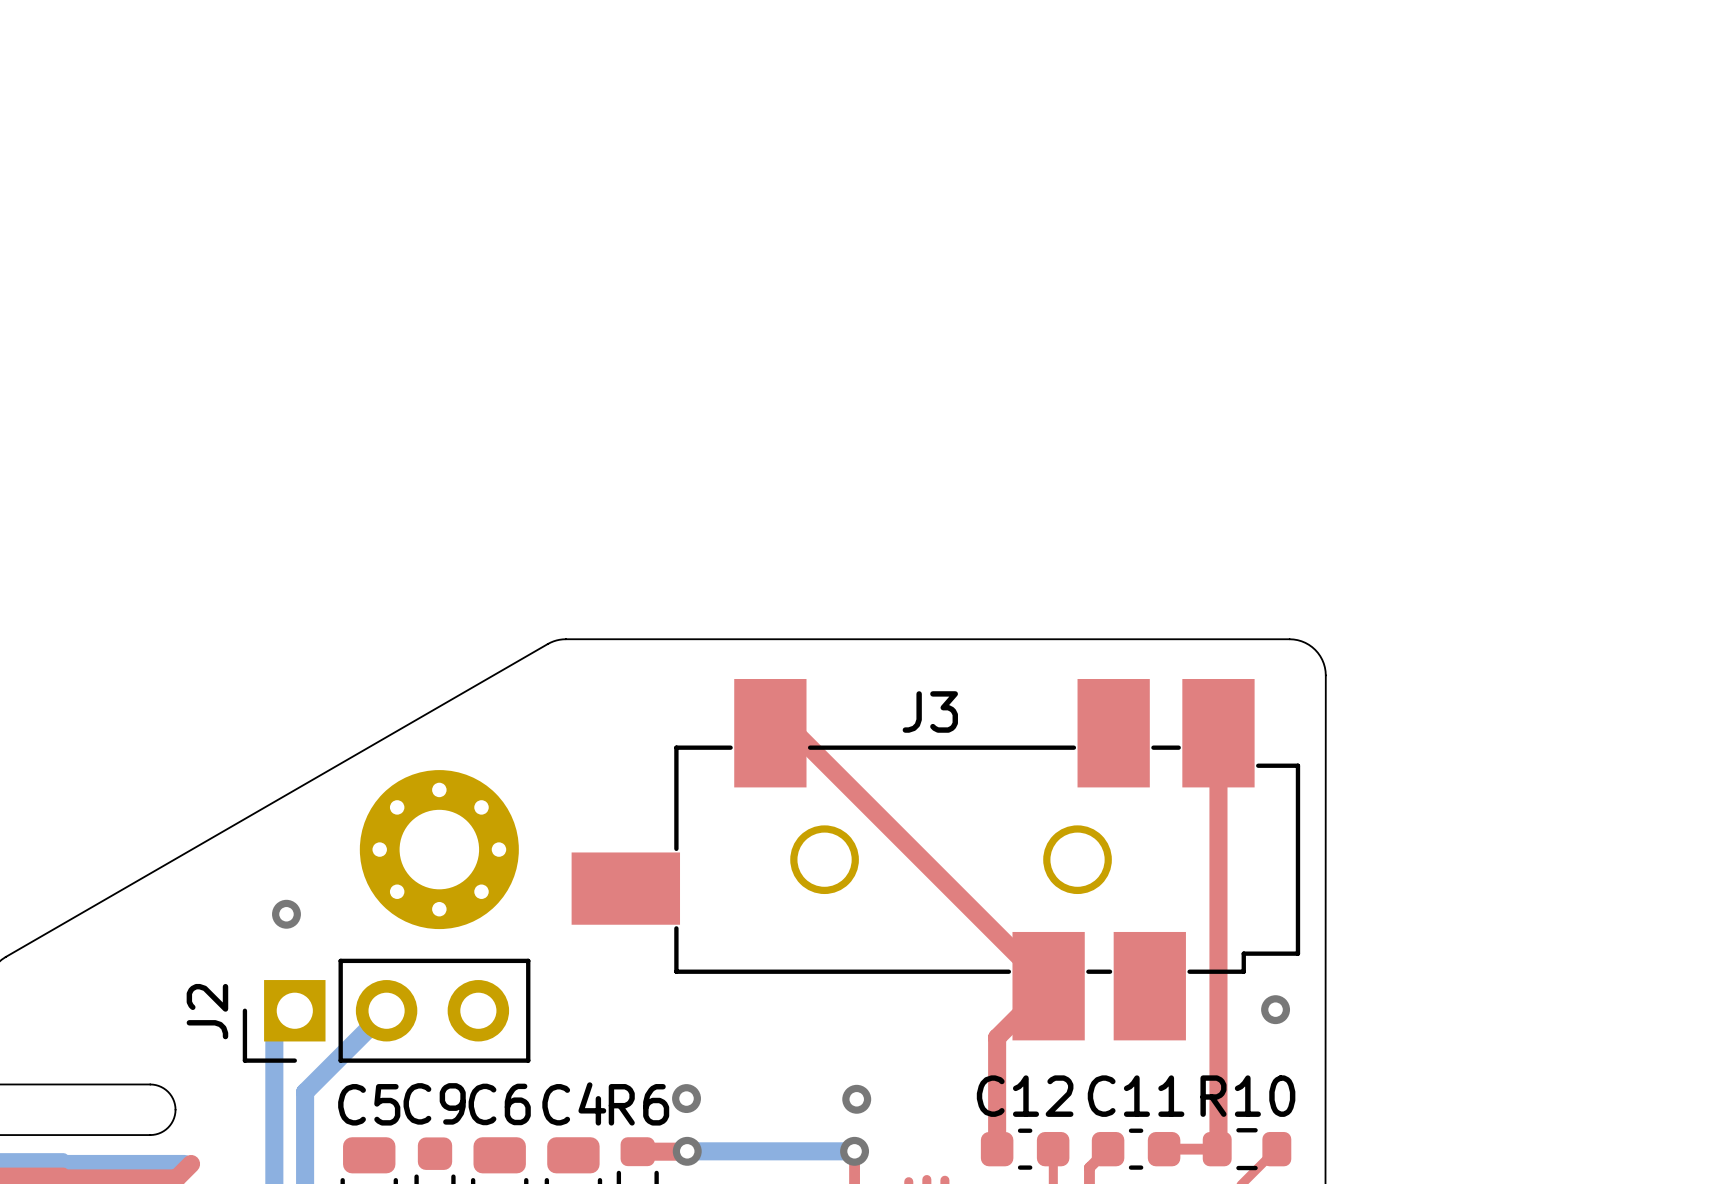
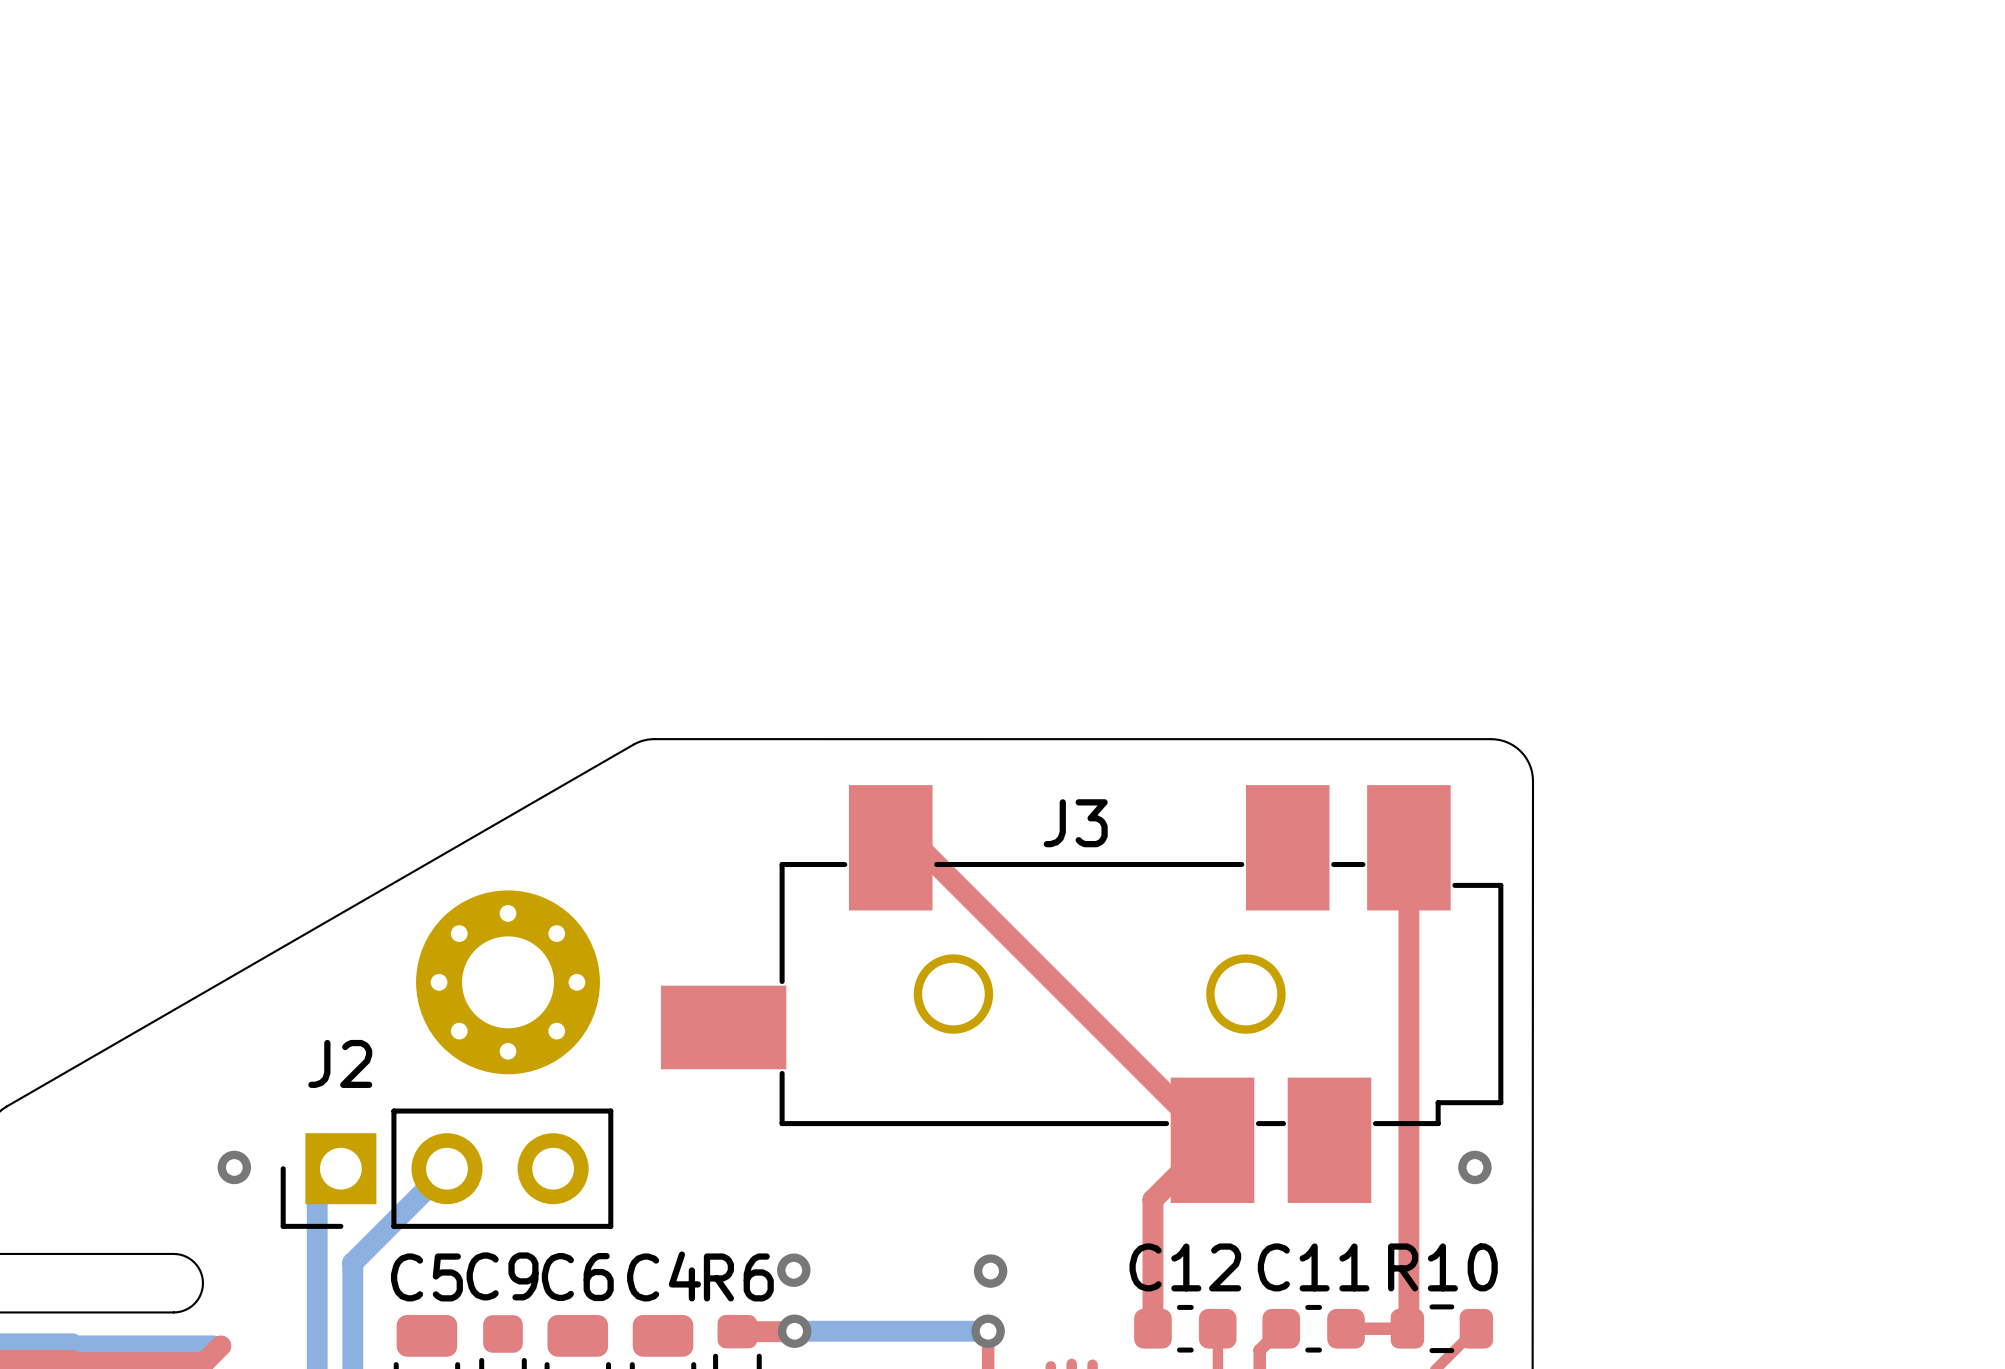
via position: (286, 914) -> (234, 1167)
J2 name rotation: 0° (207, 1011) -> 90° clockwise (340, 1063)
J2 name position: J2 (207, 1011) -> J2 (340, 1063)

